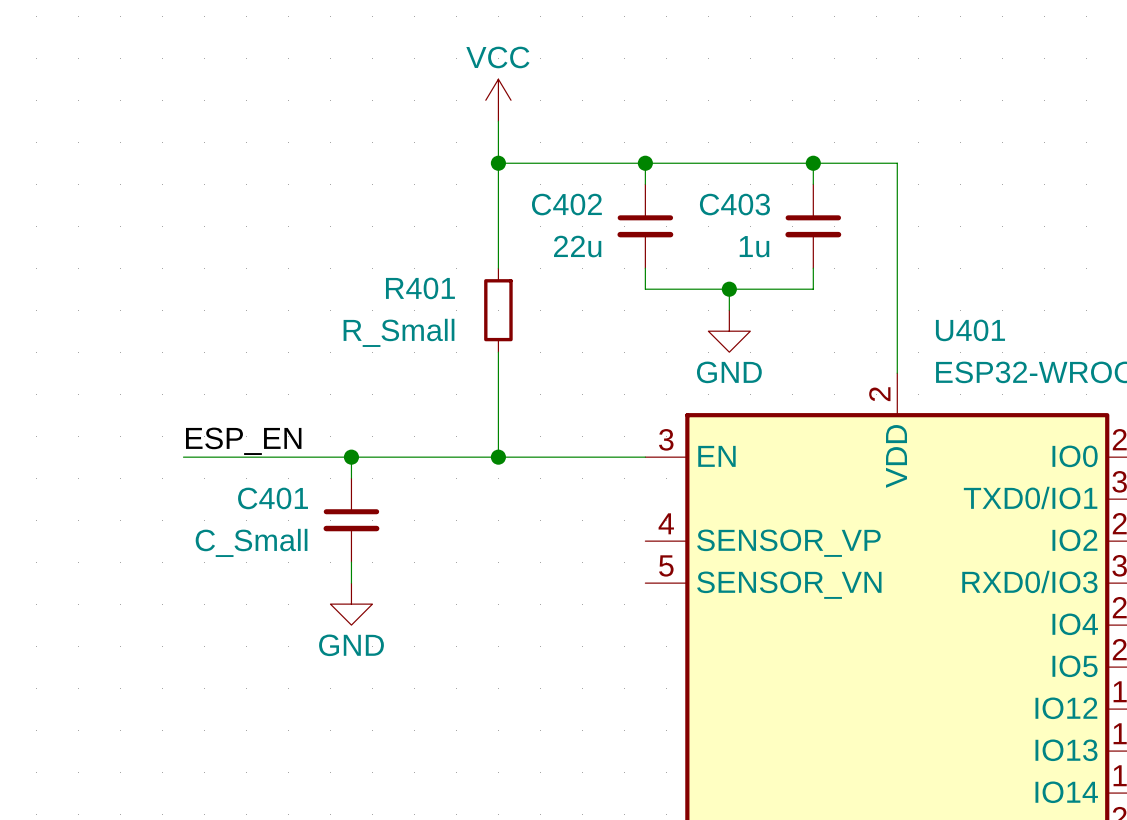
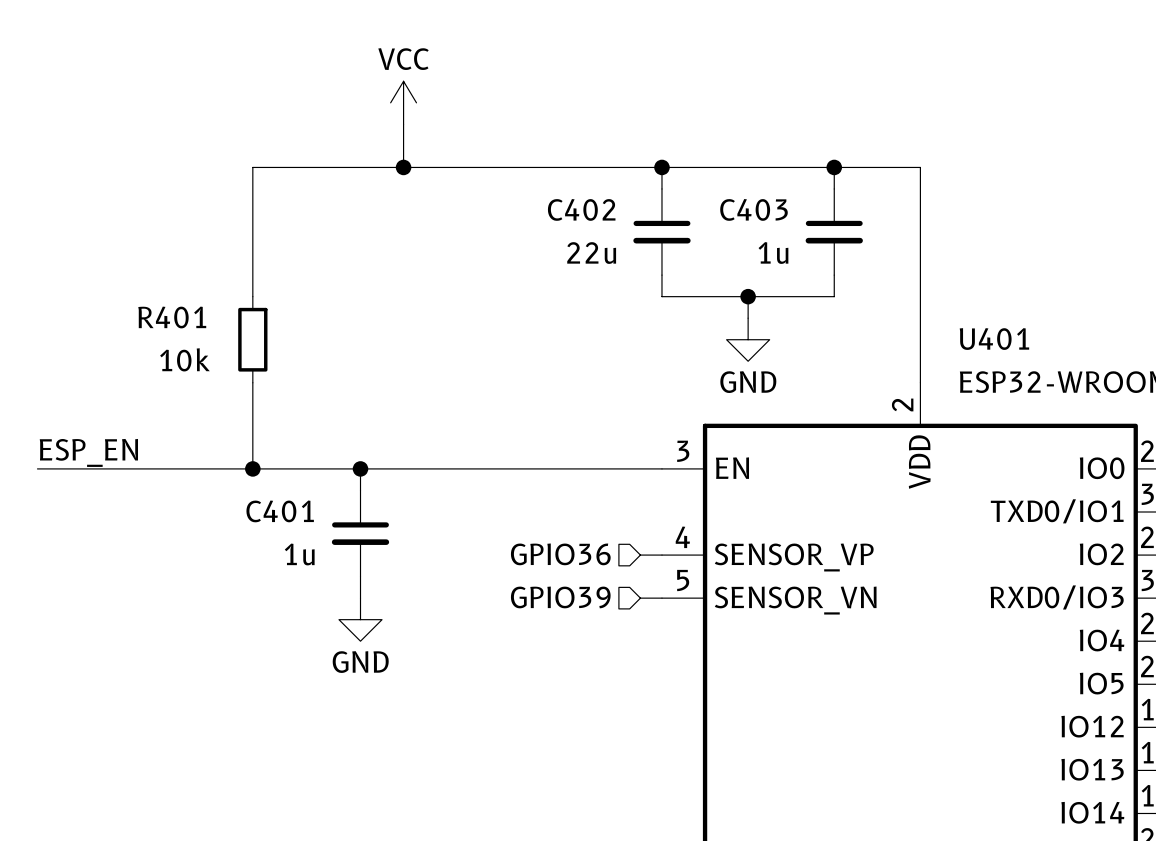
power symbol position: VCC (498, 100) -> VCC (403, 102)
wire: none -> (403, 124) (403, 167)
wire: (498, 121) (498, 268) -> none
junction: none -> (403, 167)
wire: none -> (511, 167) (252, 167) (252, 296)
junction: (498, 163) -> none
R401 position: (498, 310) -> (252, 339)
R401 value: R_Small (399, 332) -> 10k (184, 359)
wire: (498, 352) (498, 457) -> none
wire: none -> (252, 382) (252, 468)
label position: ESP_EN (243, 441) -> ESP_EN (88, 452)
wire: none -> (37, 468) (188, 468)
junction: none -> (252, 468)
junction: (498, 457) -> none
hierarchical label: none -> GPIO36 (560, 554)
wire: none -> (640, 555) (661, 555)
C401 value: C_Small (251, 542) -> 1u (299, 554)
hierarchical label: none -> GPIO39 (560, 597)
wire: none -> (640, 598) (661, 598)

